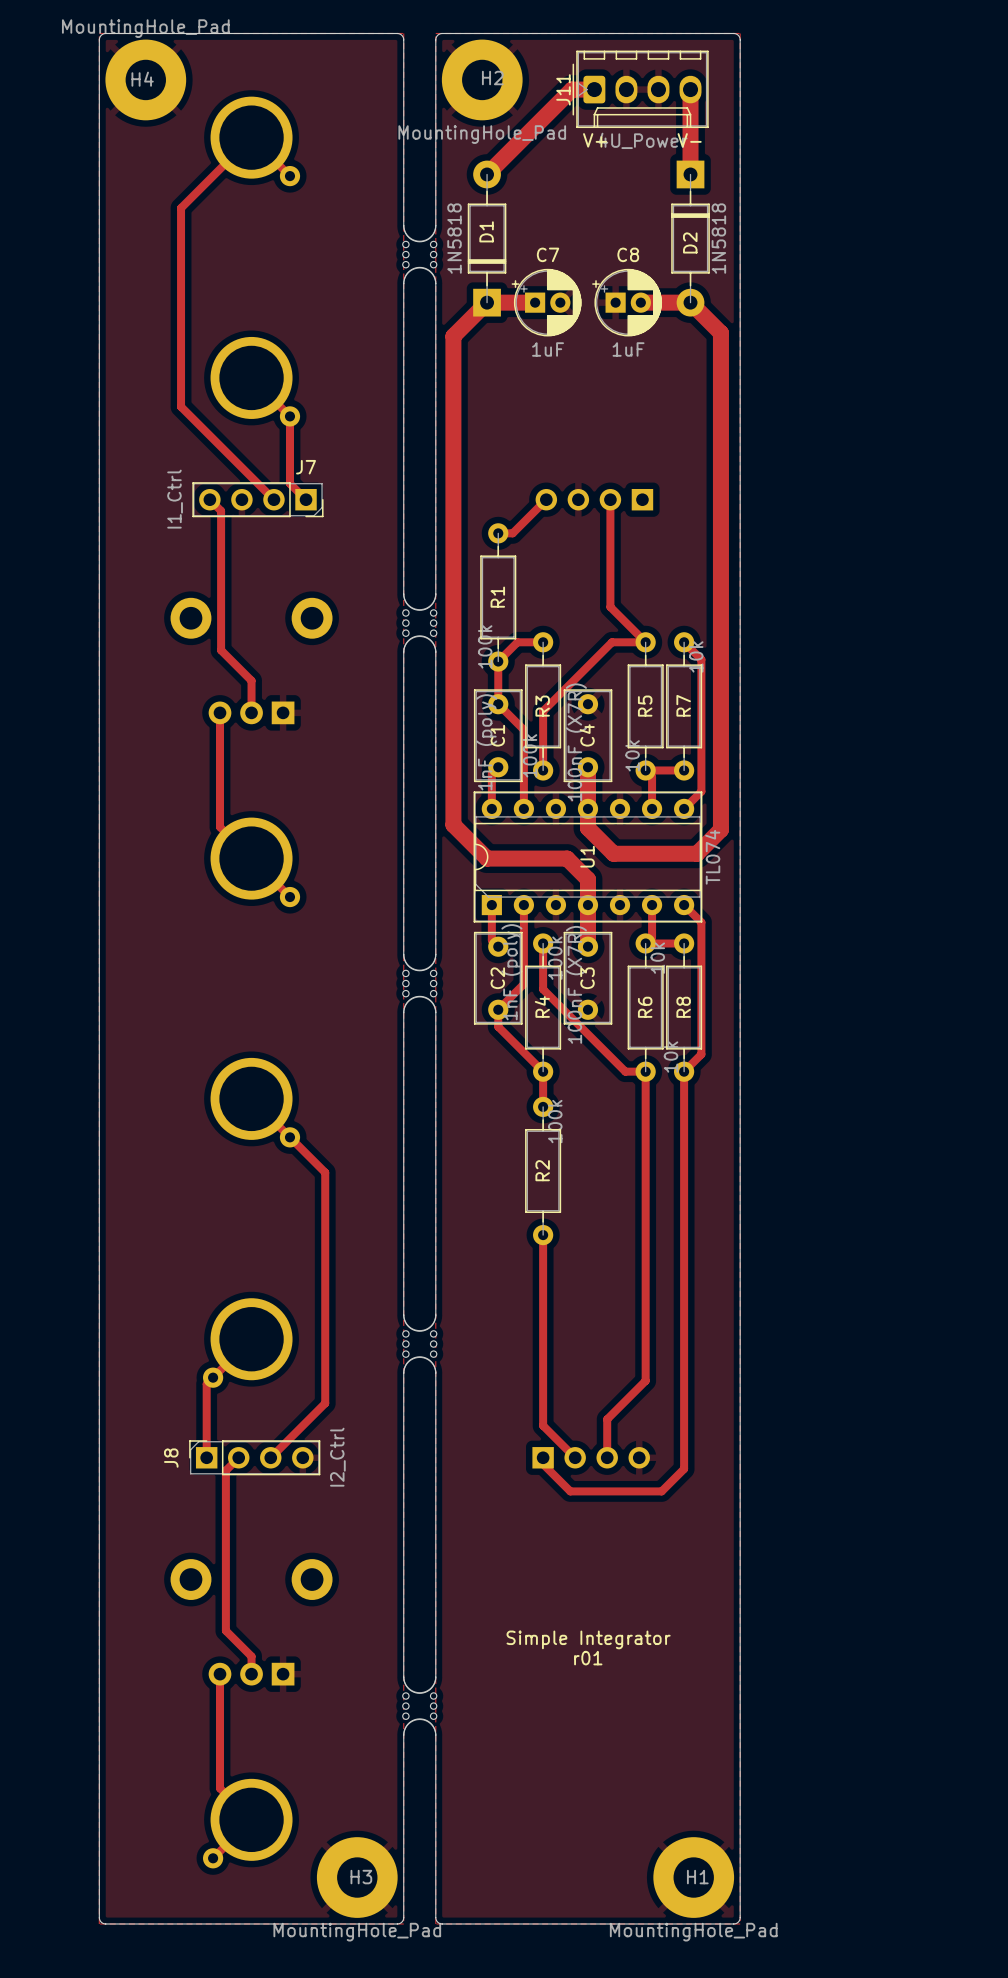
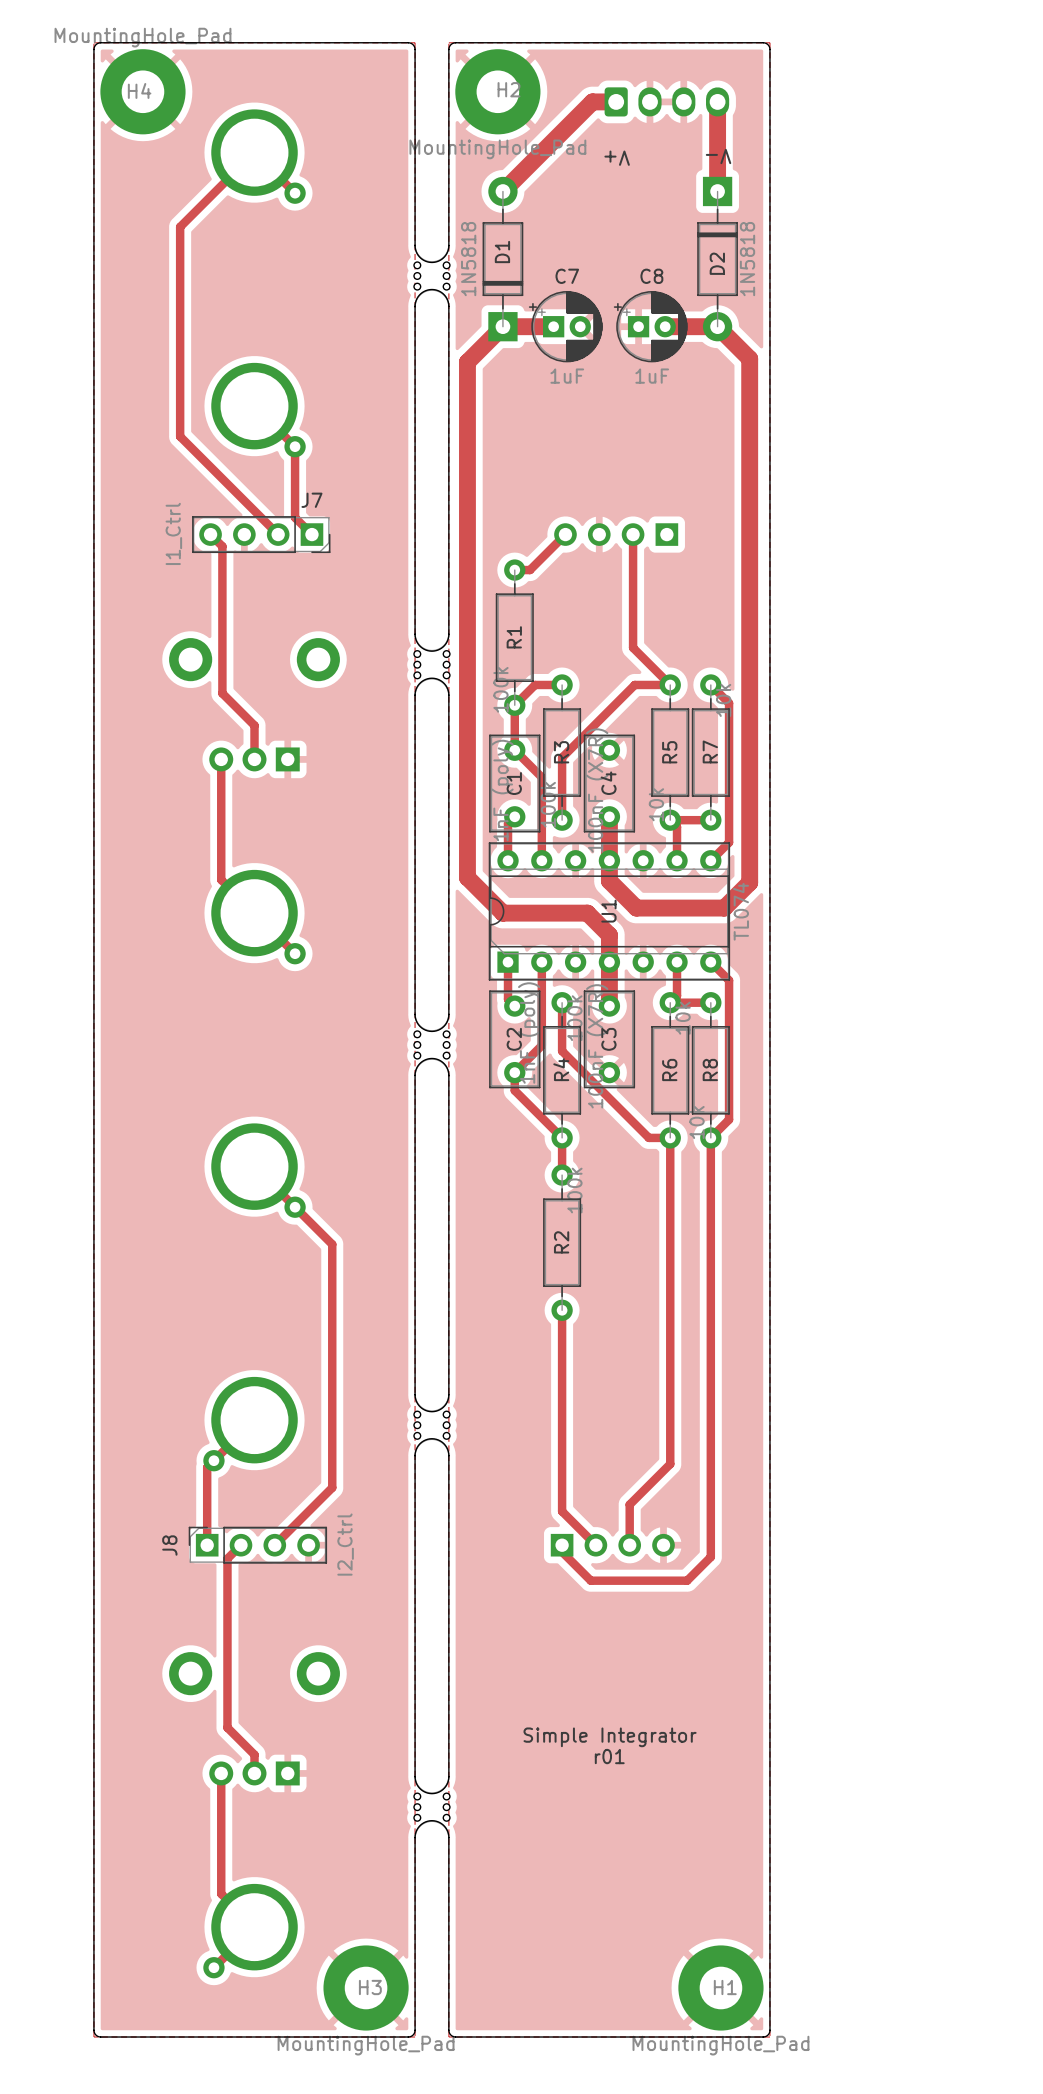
J11 side: top (640, 89) -> bottom (666, 101)

